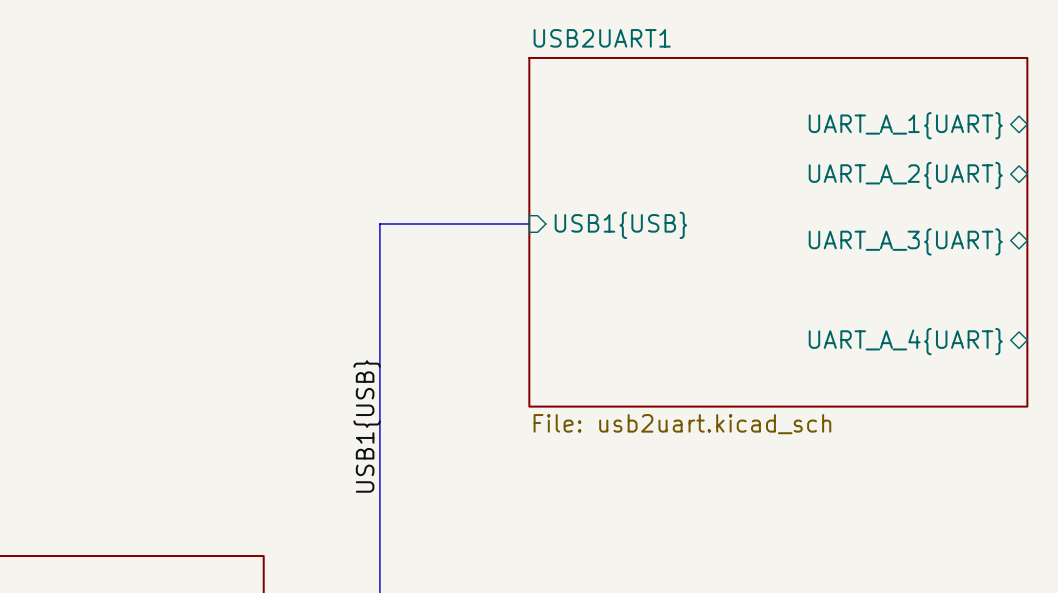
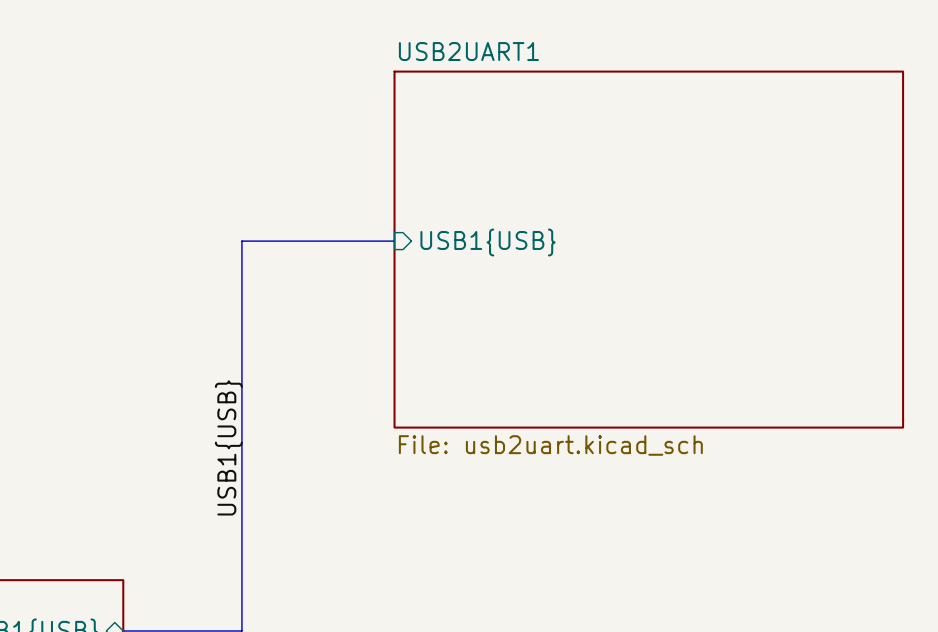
sheet pin: UART_A_1{UART} (905, 125) -> none
sheet pin: UART_A_2{UART} (905, 175) -> none
sheet pin: UART_A_3{UART} (905, 241) -> none
sheet pin: UART_A_4{UART} (905, 341) -> none

